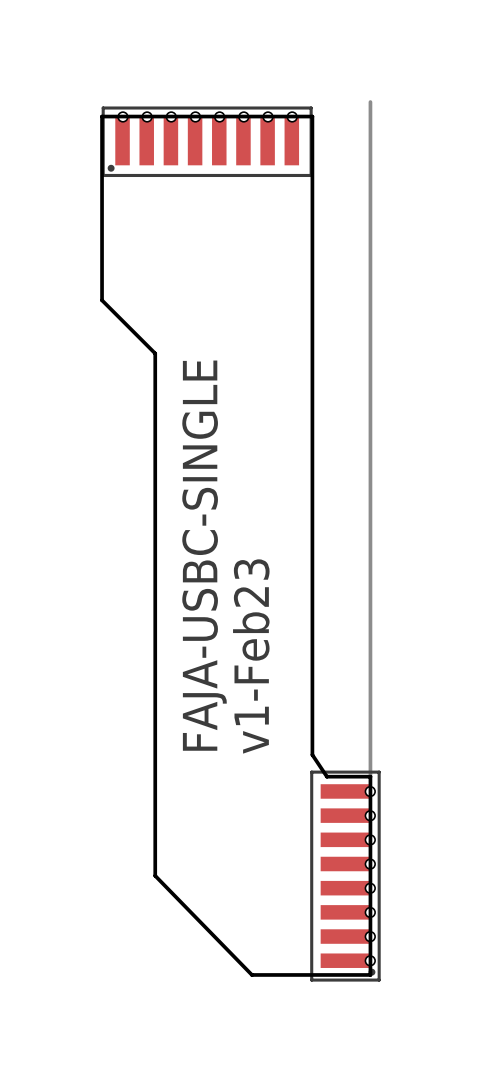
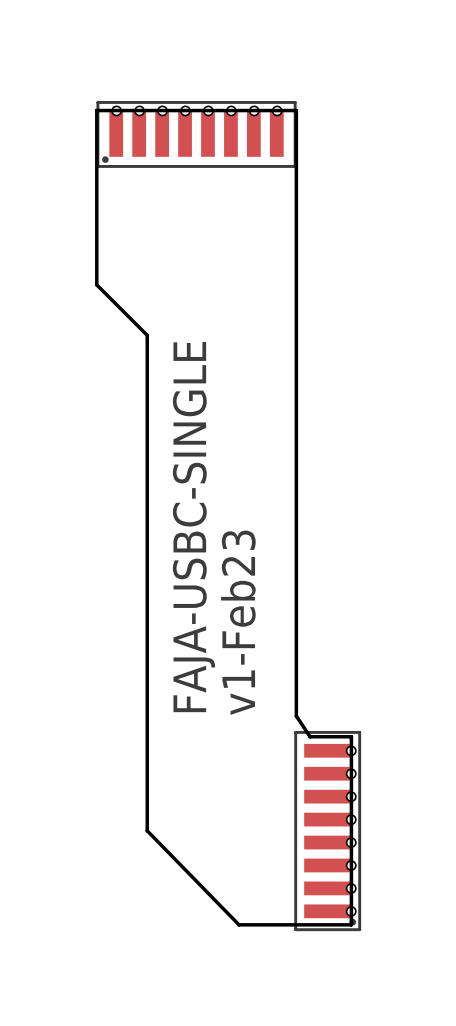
line: (370, 102) (370, 776) -> none

